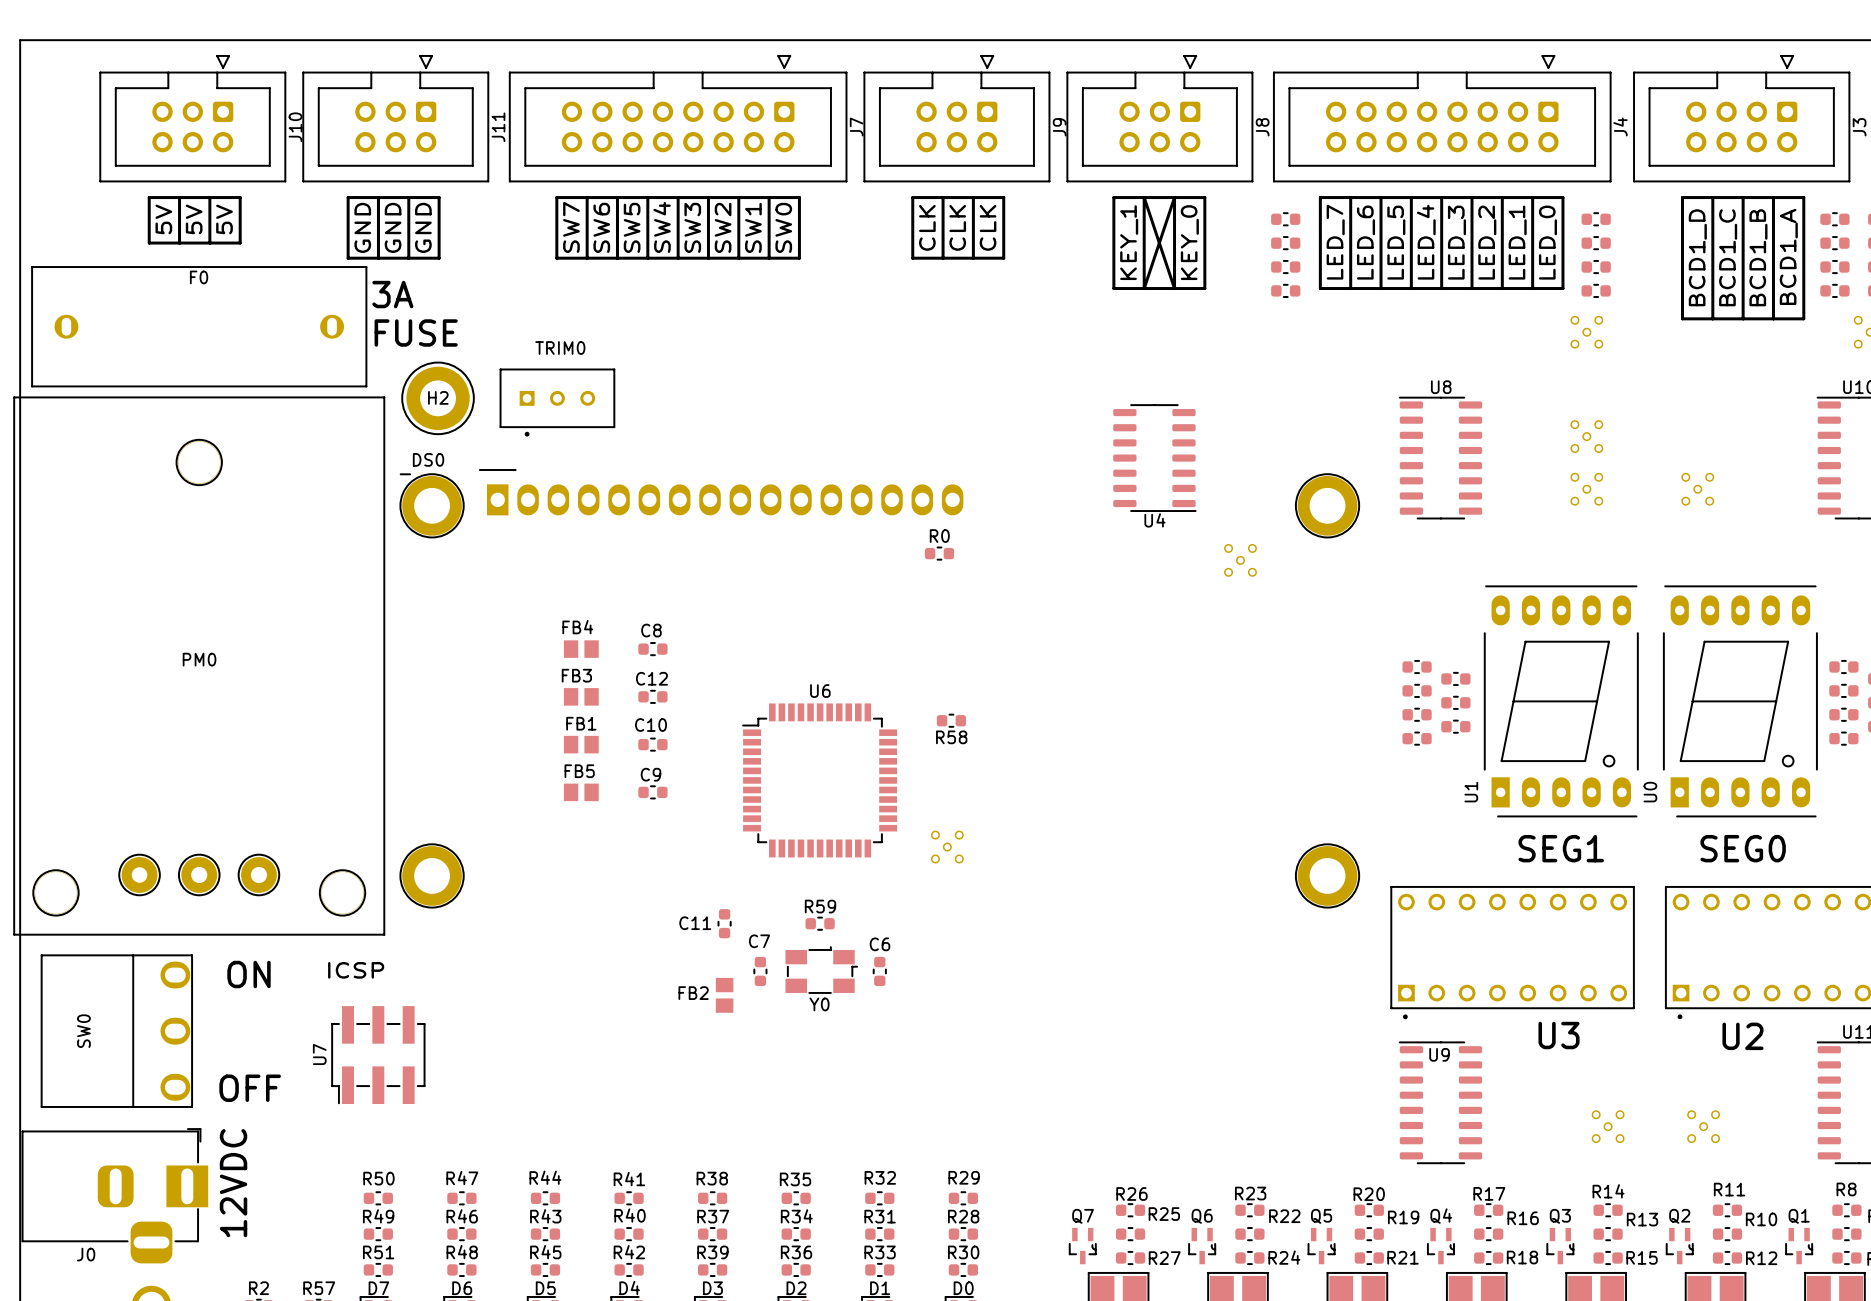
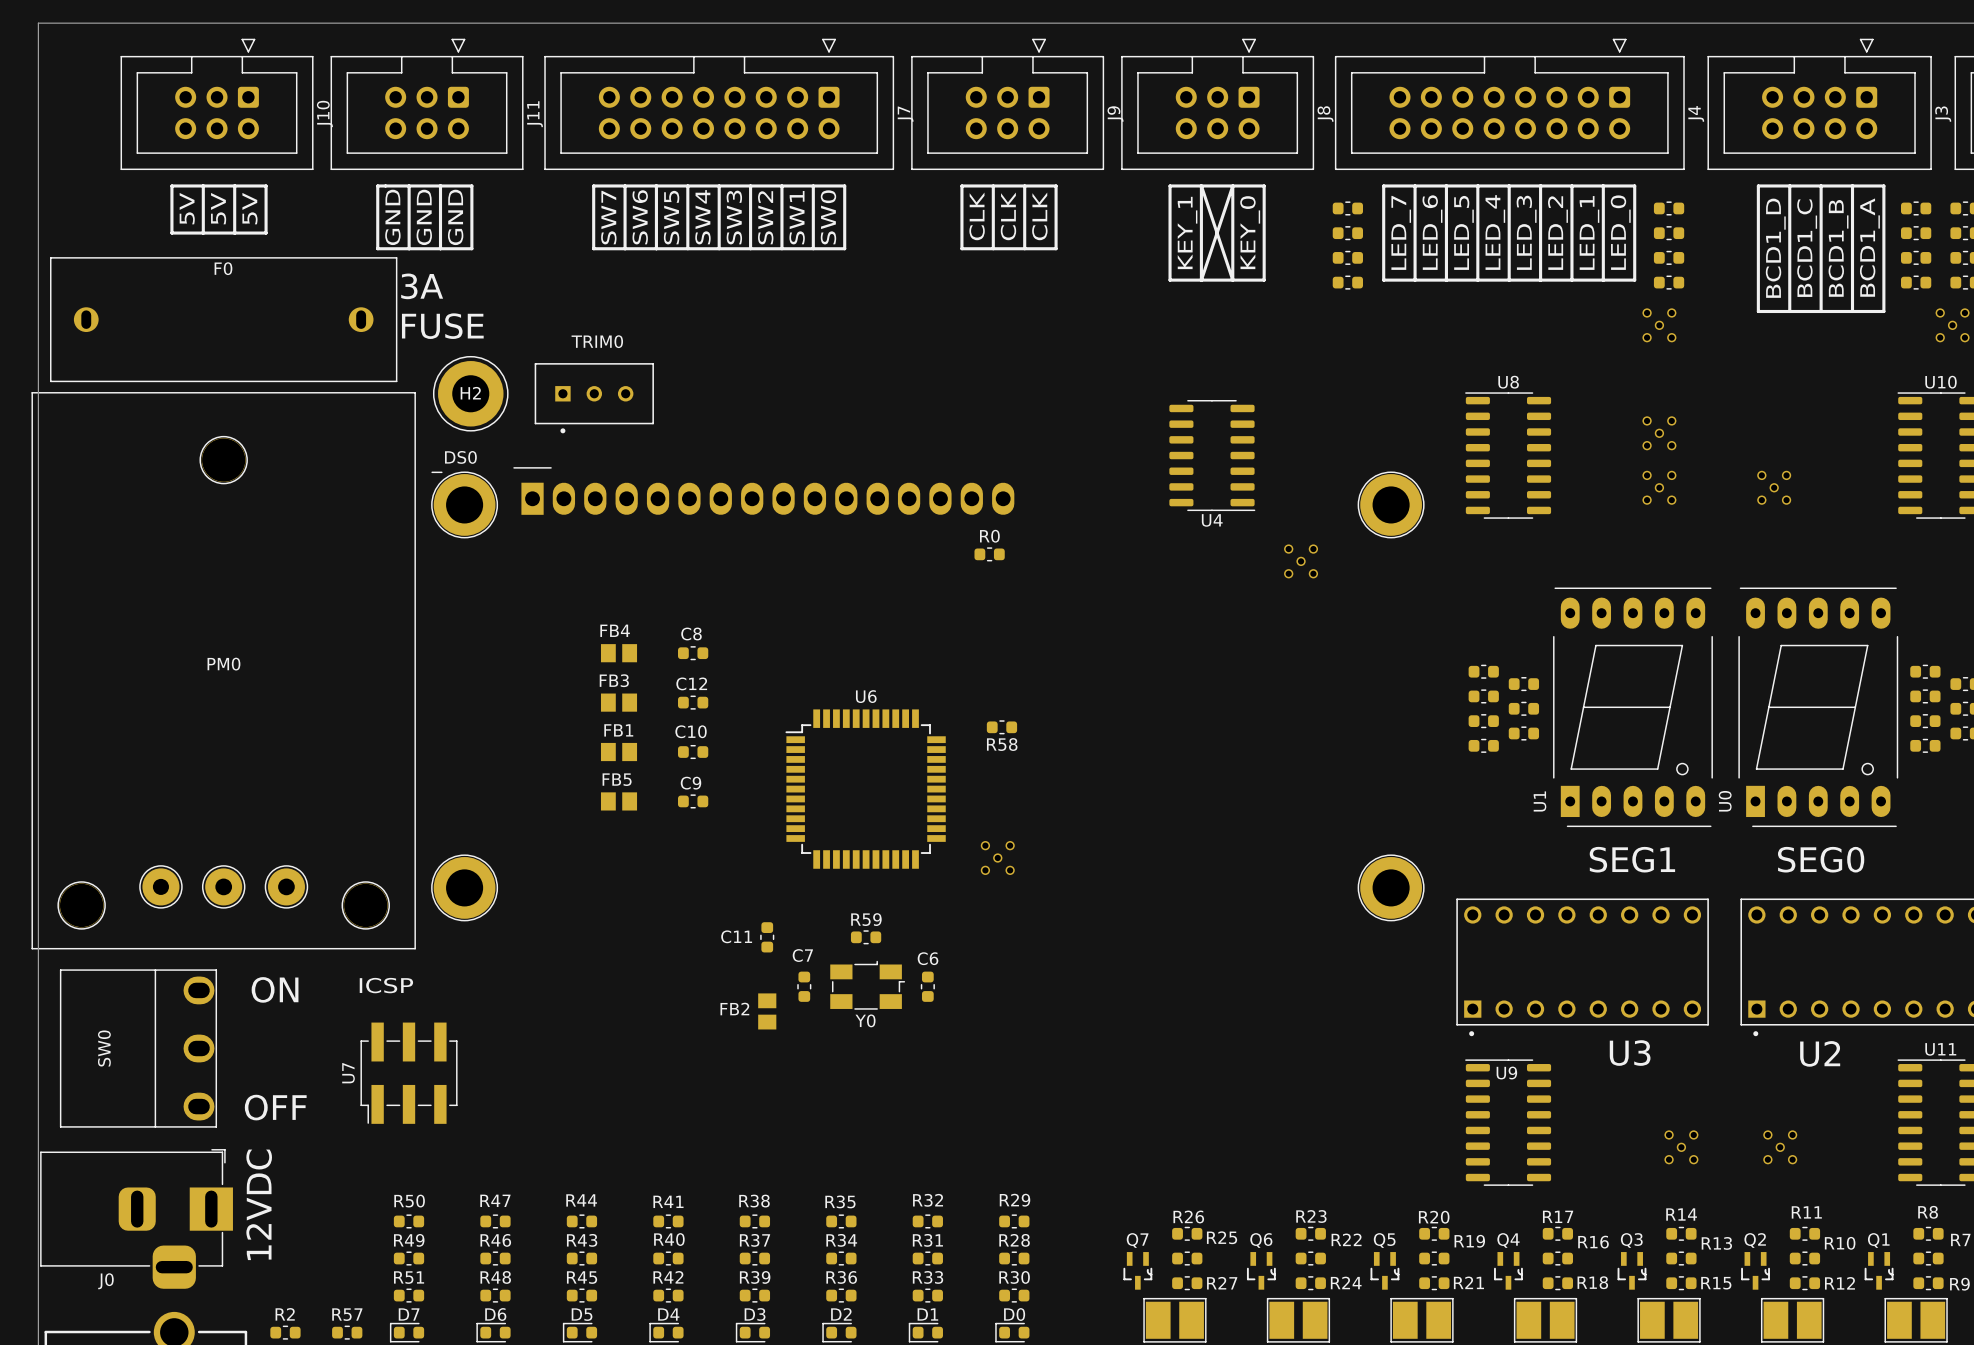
PM0 footprint: [13, 396, 386, 936] -> [31, 392, 416, 950]

